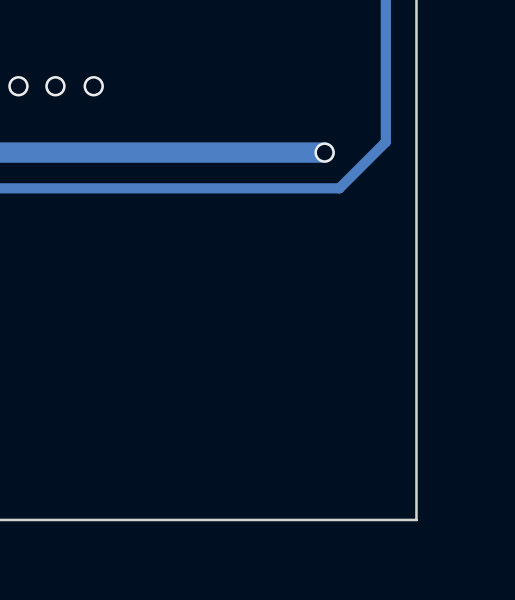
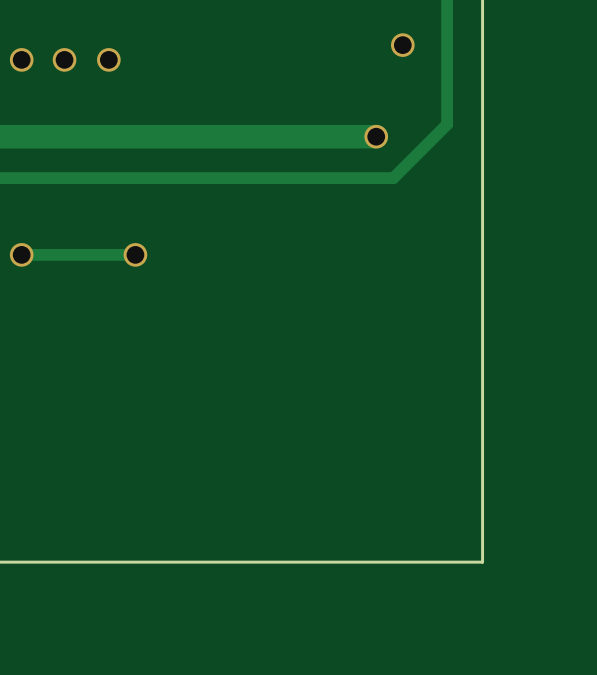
via: none -> (402, 45)
via: none -> (21, 254)
track: none -> (135, 254) (21, 254)
via: none -> (135, 254)

